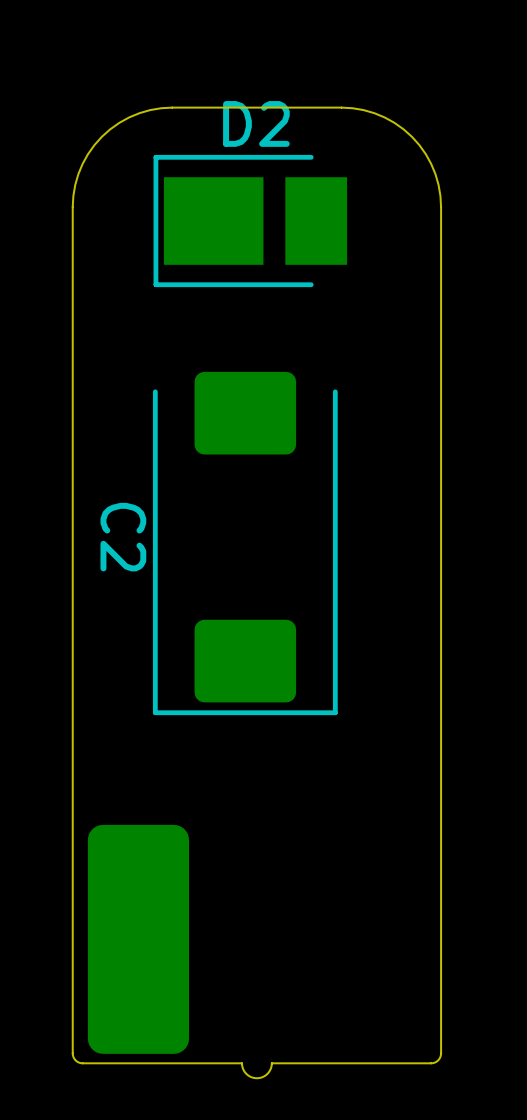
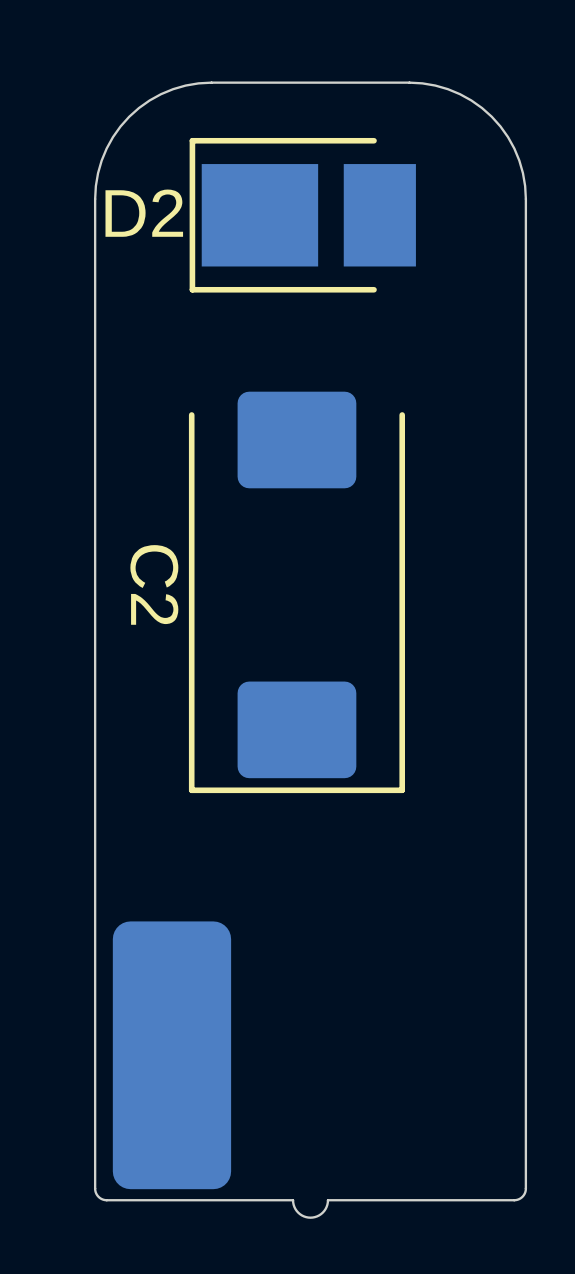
D2 name position: D2 (256, 123) -> D2 (144, 213)

